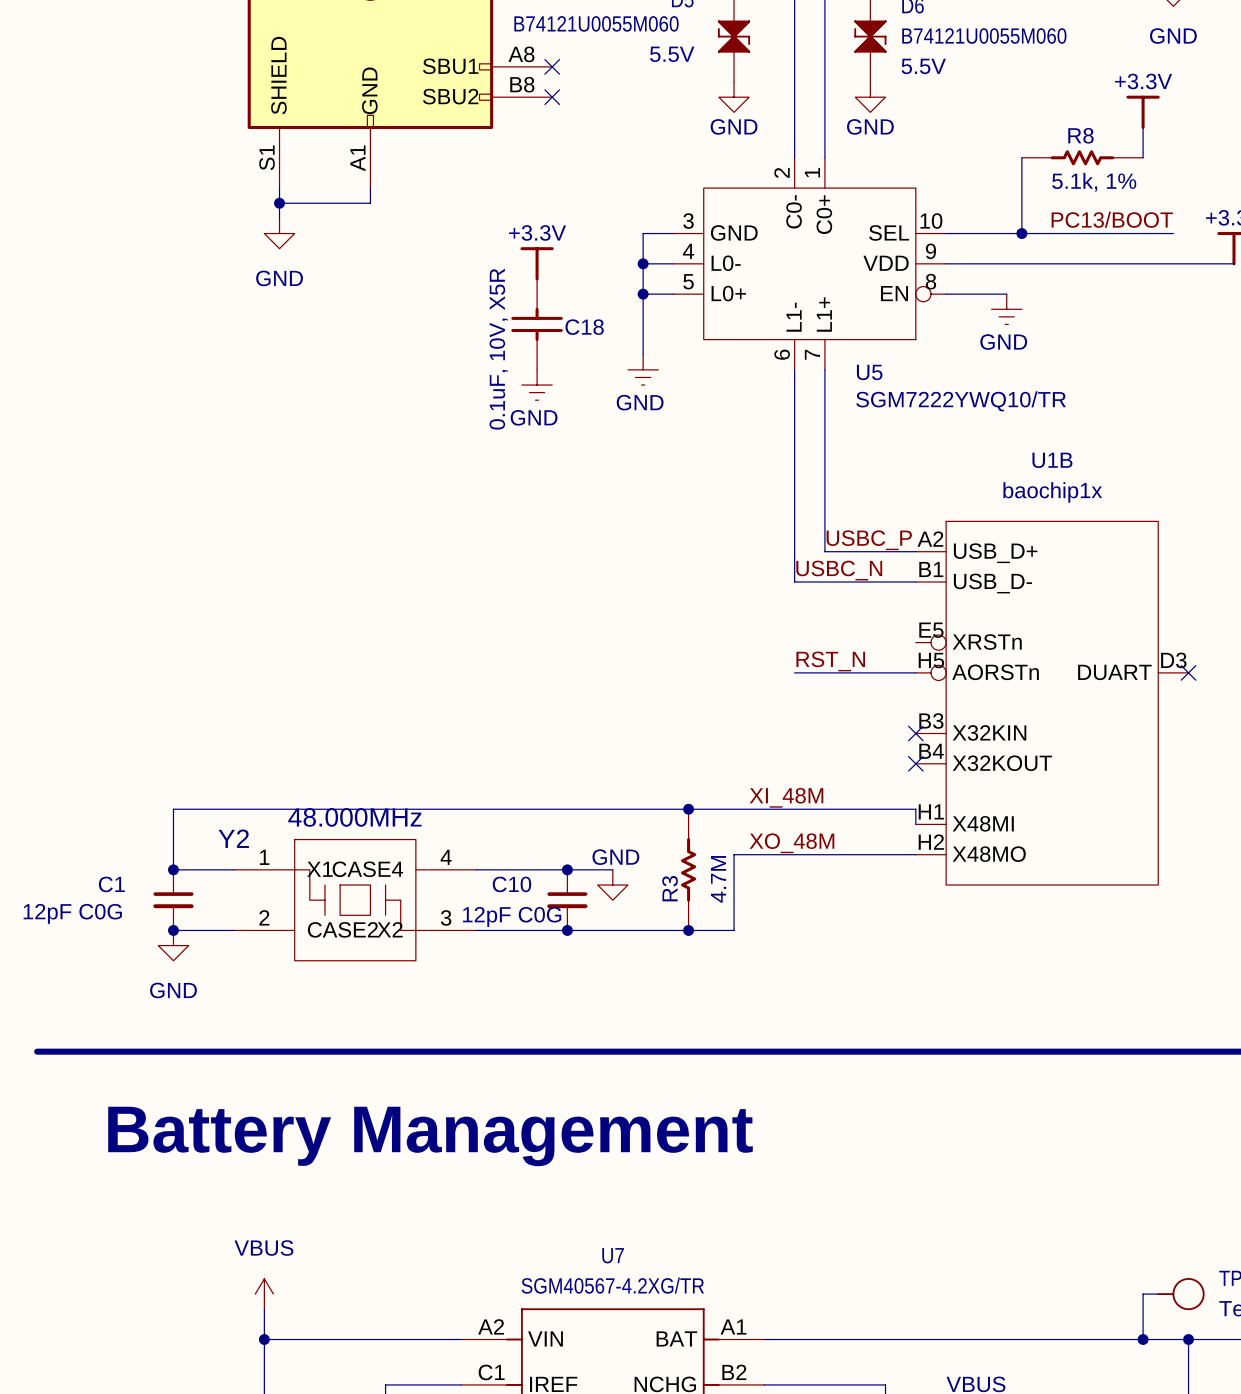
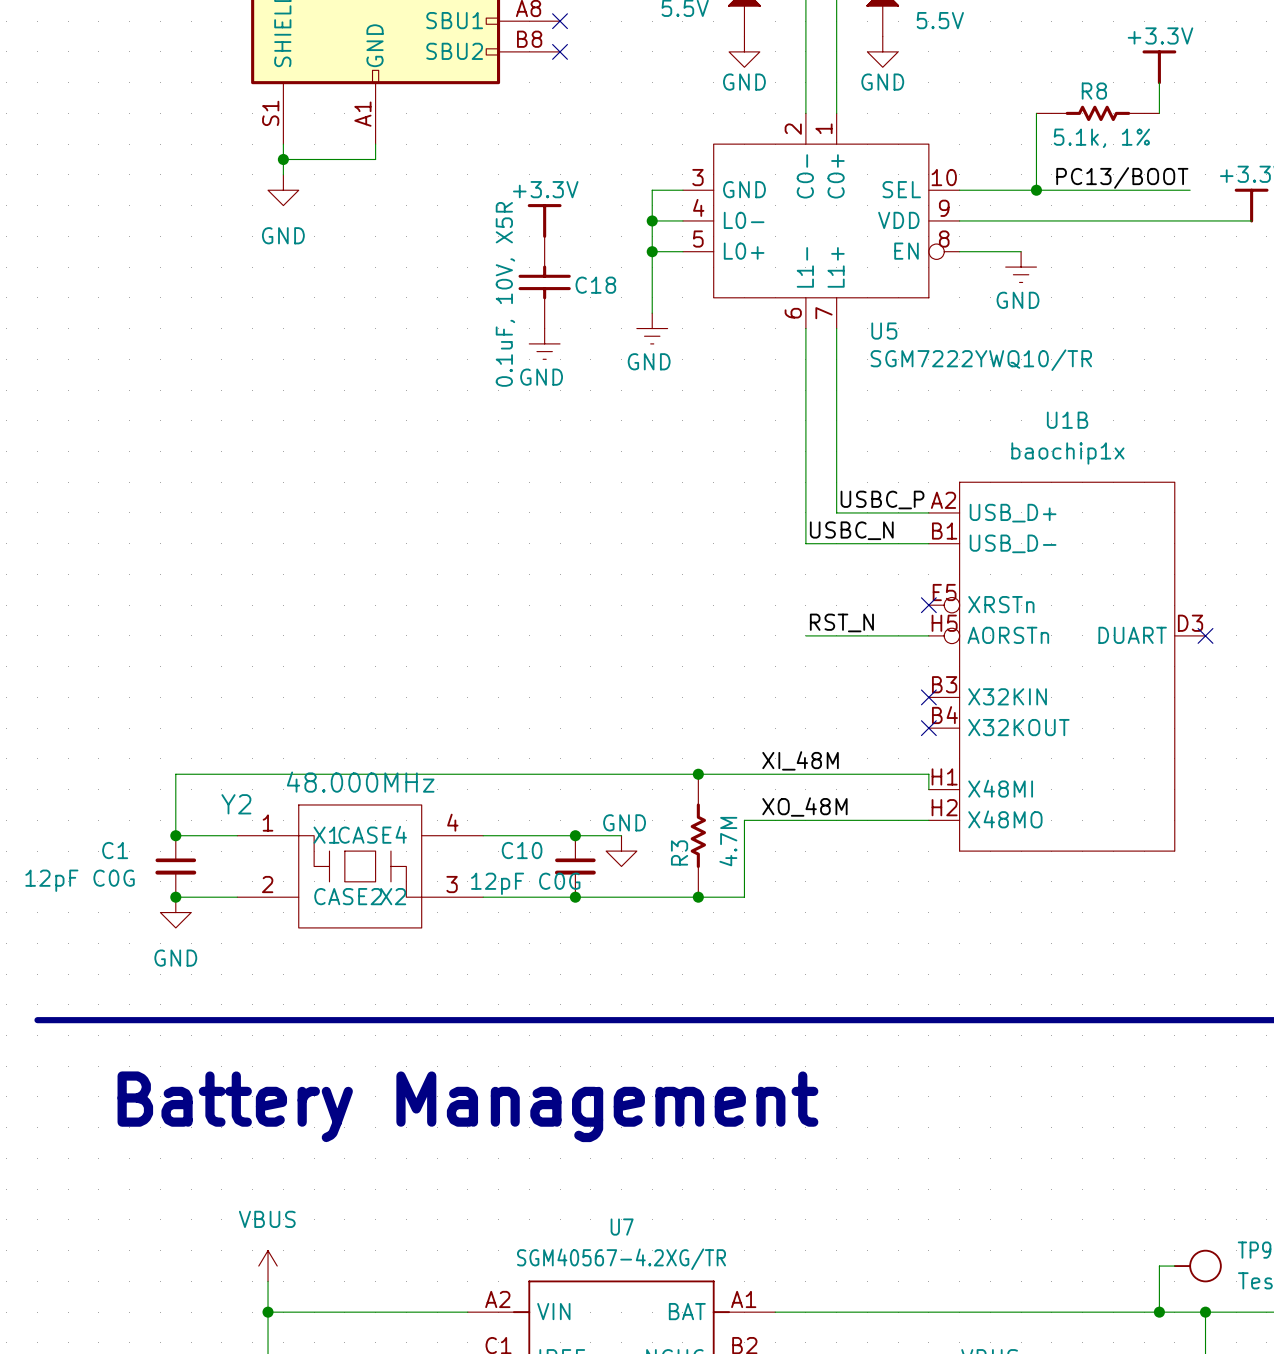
no-connect mark: none -> (928, 605)

